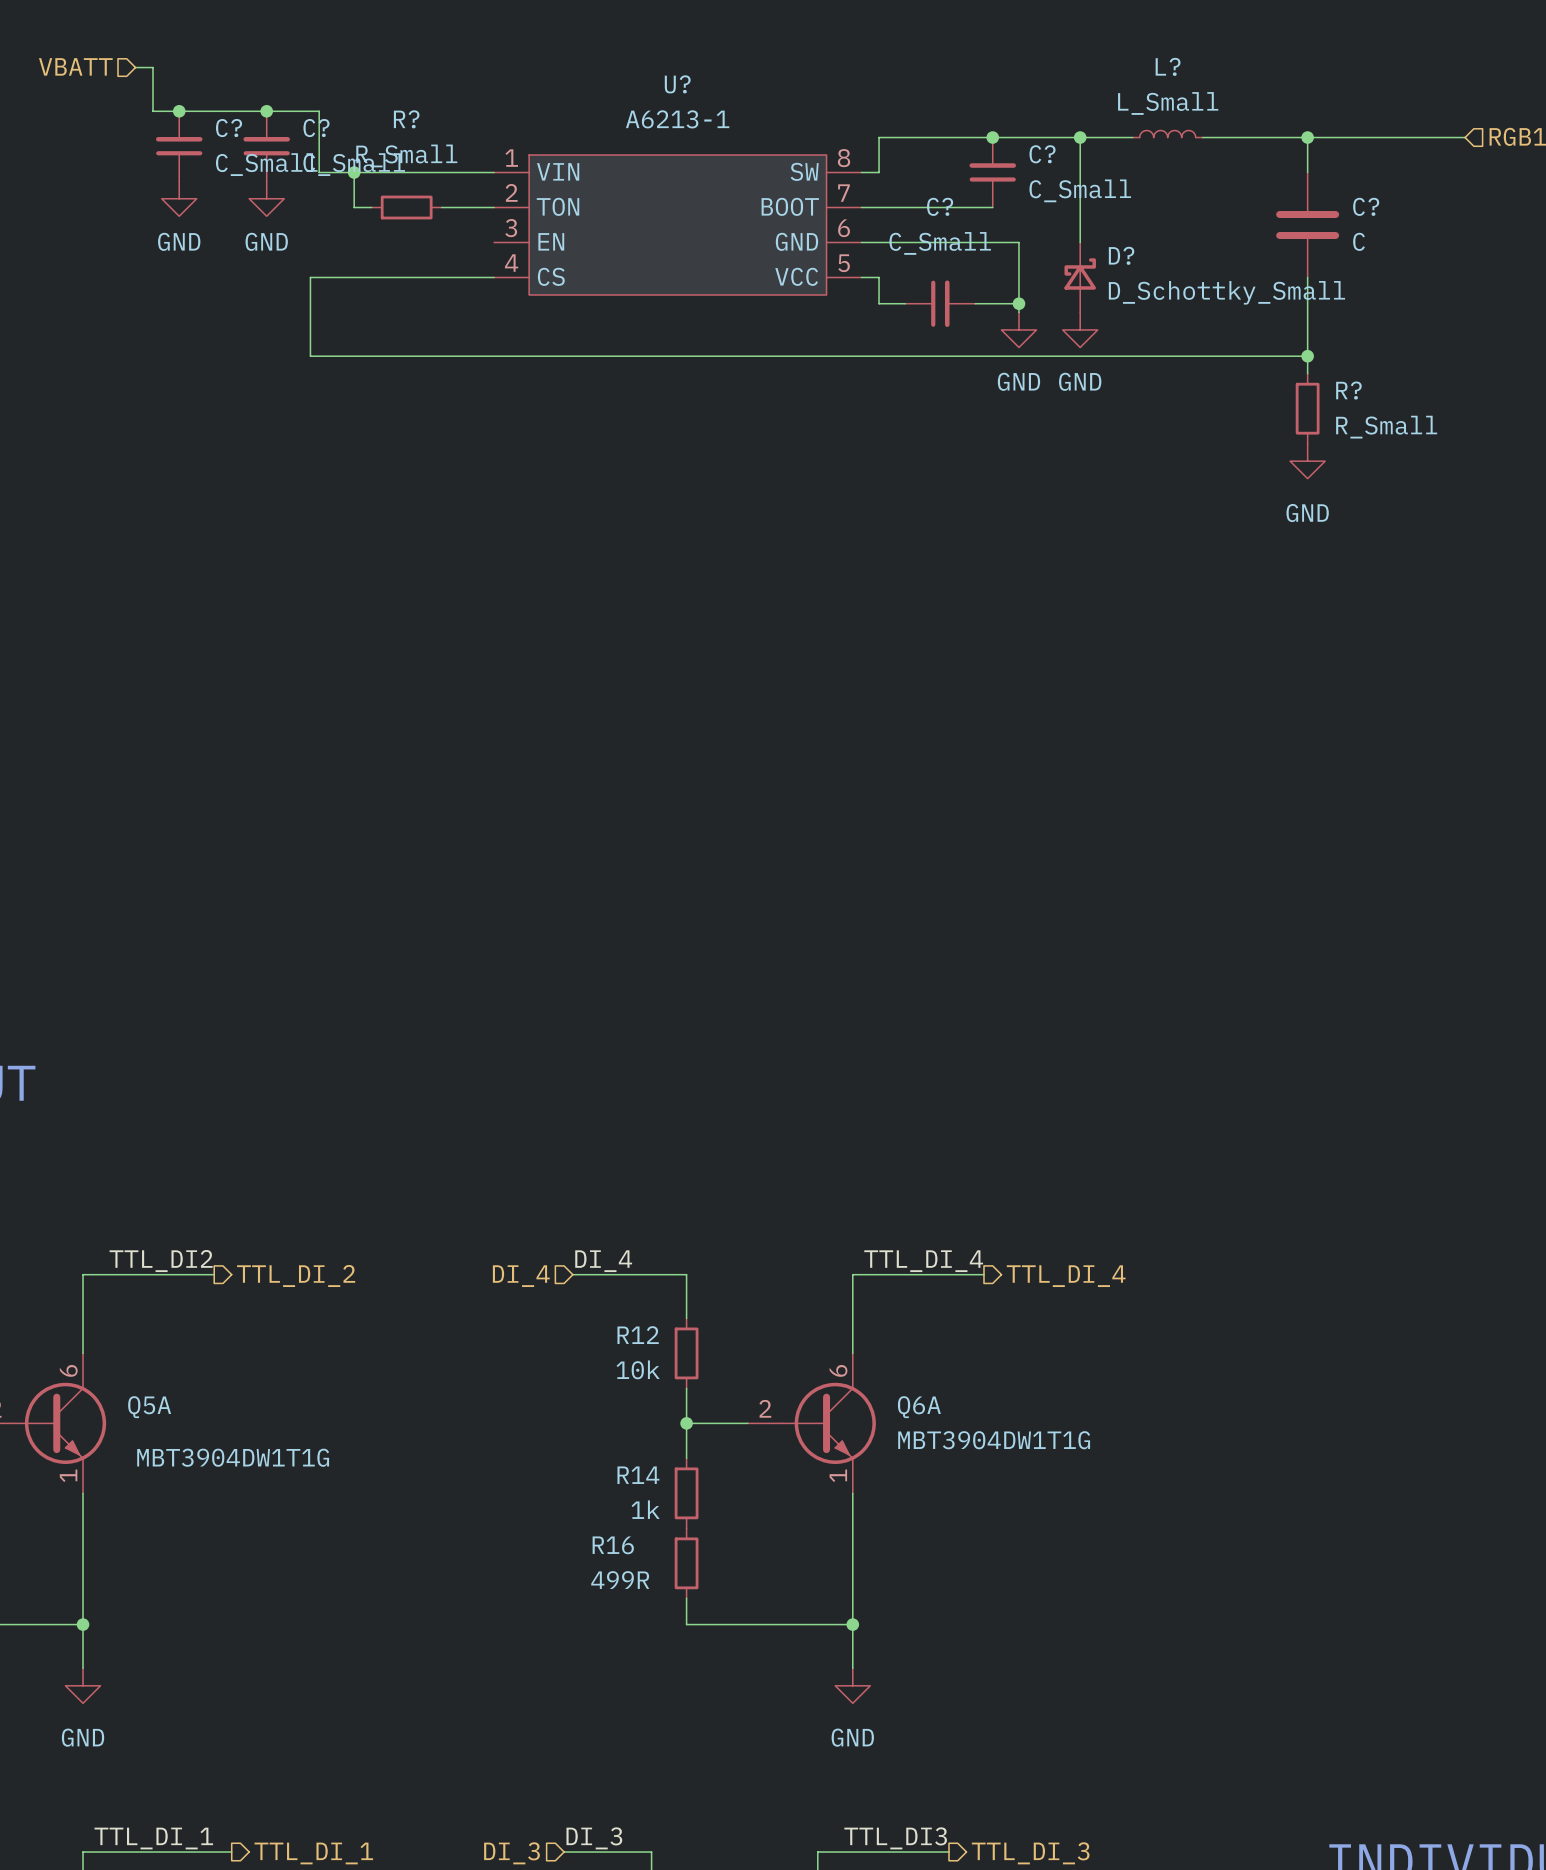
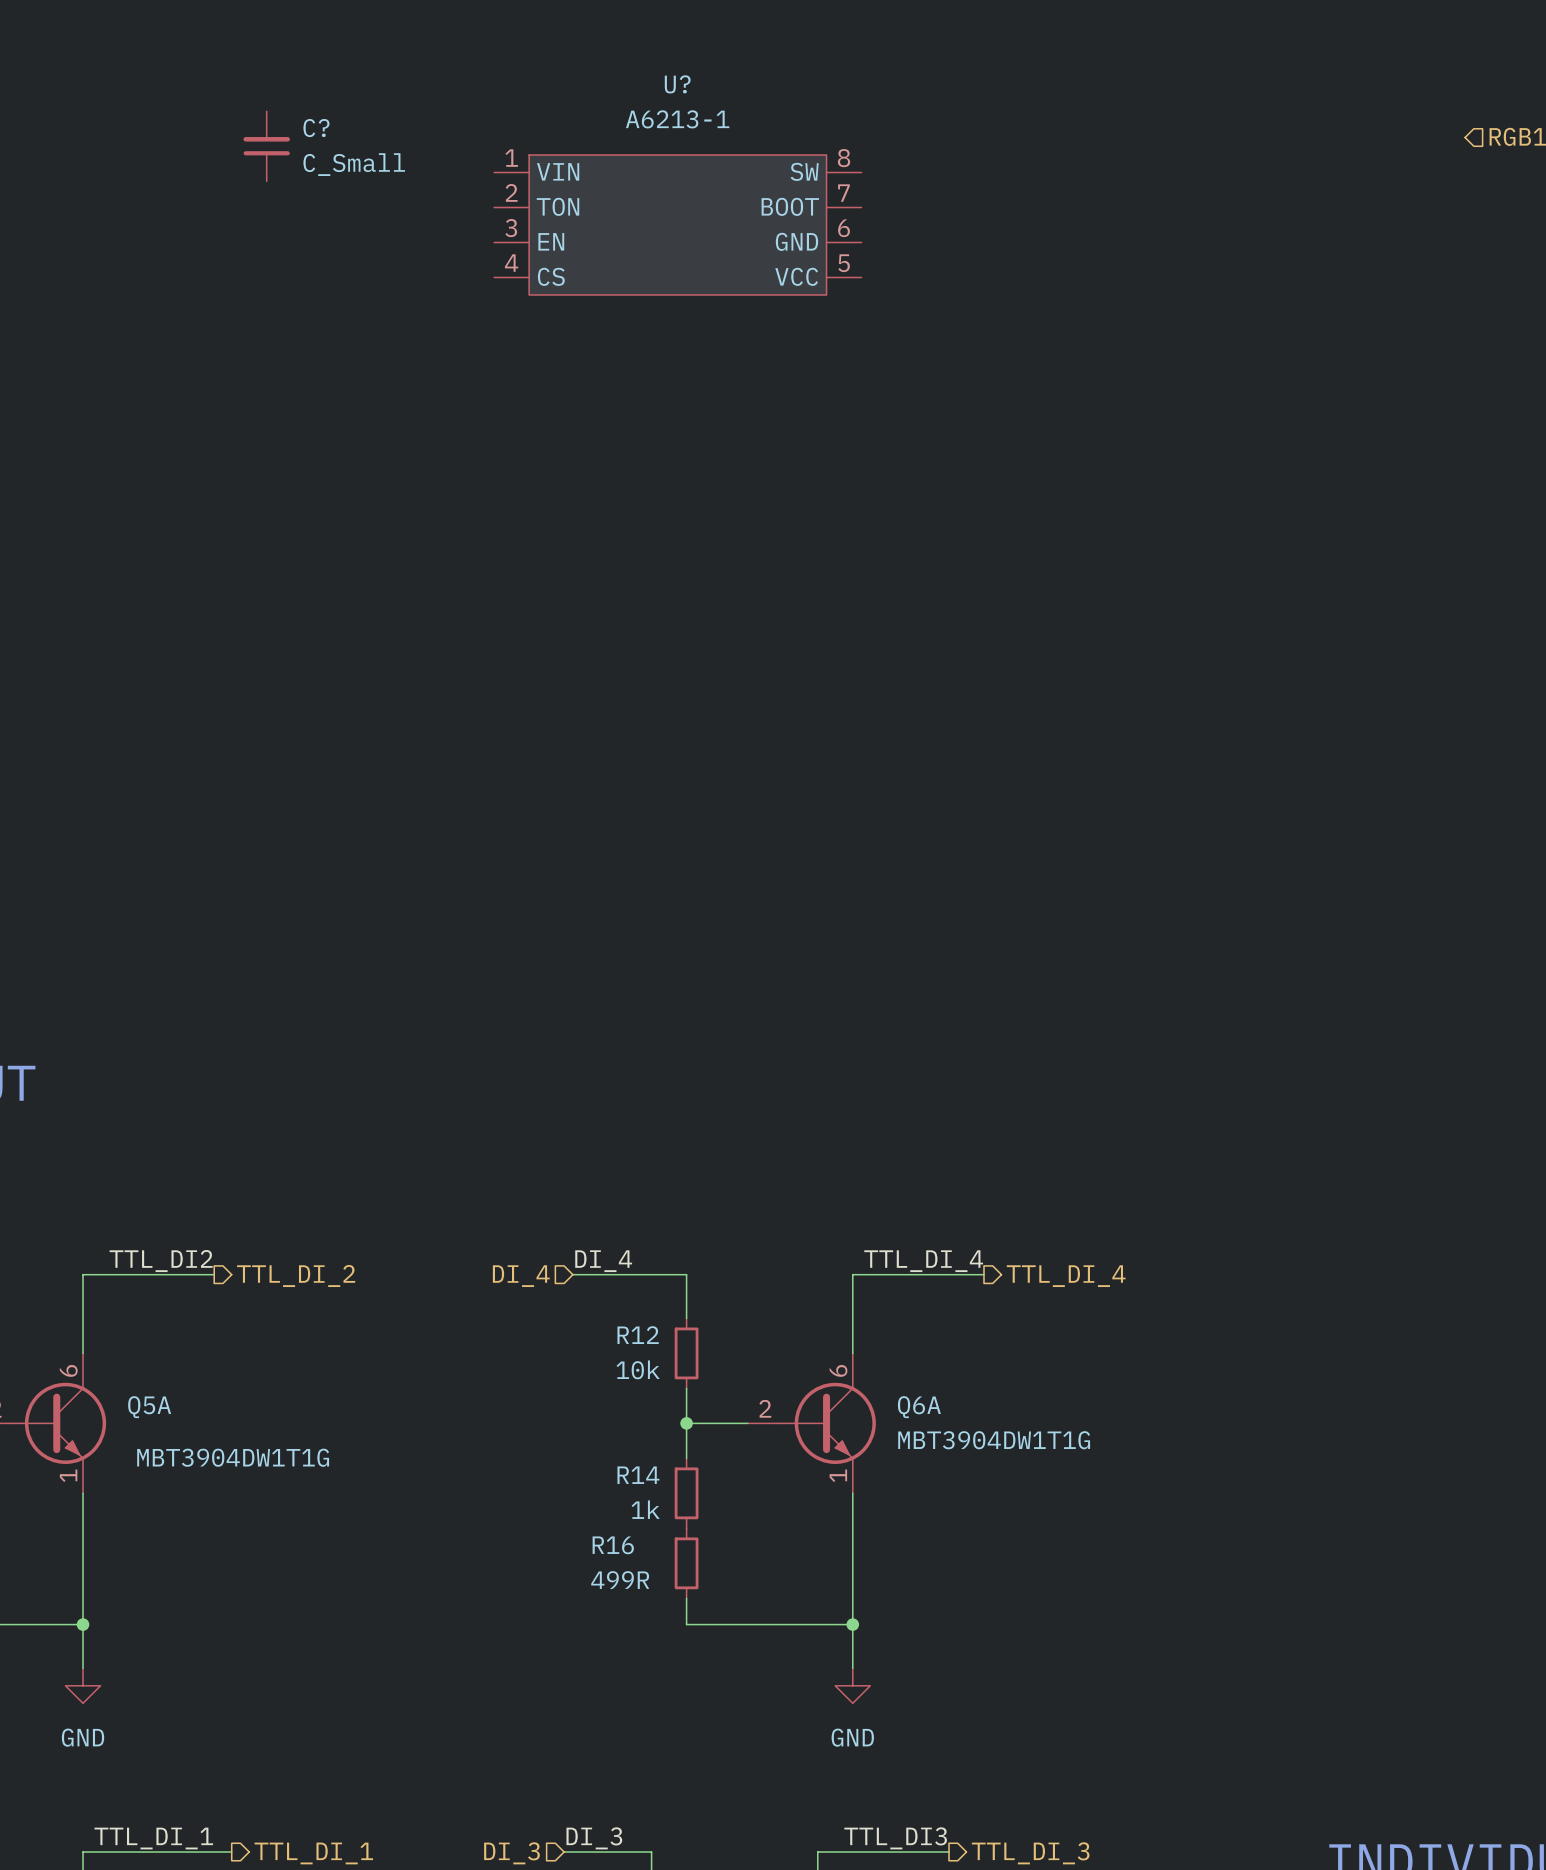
hierarchical label: VBATT (75, 66) -> none
wire: (135, 67) (152, 67) (152, 111) (319, 111) (319, 172) (494, 172) -> none
junction: (179, 111) -> none
junction: (266, 111) -> none
L?: L_Small (1167, 134) -> none
junction: (992, 137) -> none
wire: (1080, 137) (1080, 242) -> none
junction: (1080, 137) -> none
wire: (1132, 137) (879, 137) (879, 172) (861, 172) -> none
wire: (1202, 137) (1465, 137) -> none
wire: (1307, 137) (1307, 172) -> none
junction: (1307, 137) -> none
C?: C_Small (179, 146) -> none
wire: (354, 172) (354, 207) (371, 207) -> none
junction: (354, 172) -> none
C?: C_Small (992, 172) -> none
power symbol: GND (179, 198) -> none
power symbol: GND (266, 198) -> none
R?: R_Small (406, 207) -> none
wire: (441, 207) (494, 207) -> none
wire: (861, 207) (992, 207) -> none
C?: C (1307, 225) -> none
wire: (861, 242) (1018, 242) (1018, 312) -> none
wire: (494, 277) (310, 277) (310, 356) (1307, 356) -> none
wire: (861, 277) (879, 277) (879, 303) (905, 303) -> none
D?: D_Schottky_Small (1080, 277) -> none
wire: (1307, 277) (1307, 373) -> none
C?: C_Small (940, 303) -> none
wire: (975, 303) (1018, 303) -> none
junction: (1018, 303) -> none
power symbol: GND (1018, 329) -> none
power symbol: GND (1080, 329) -> none
junction: (1307, 356) -> none
R?: R_Small (1307, 408) -> none
power symbol: GND (1307, 461) -> none

